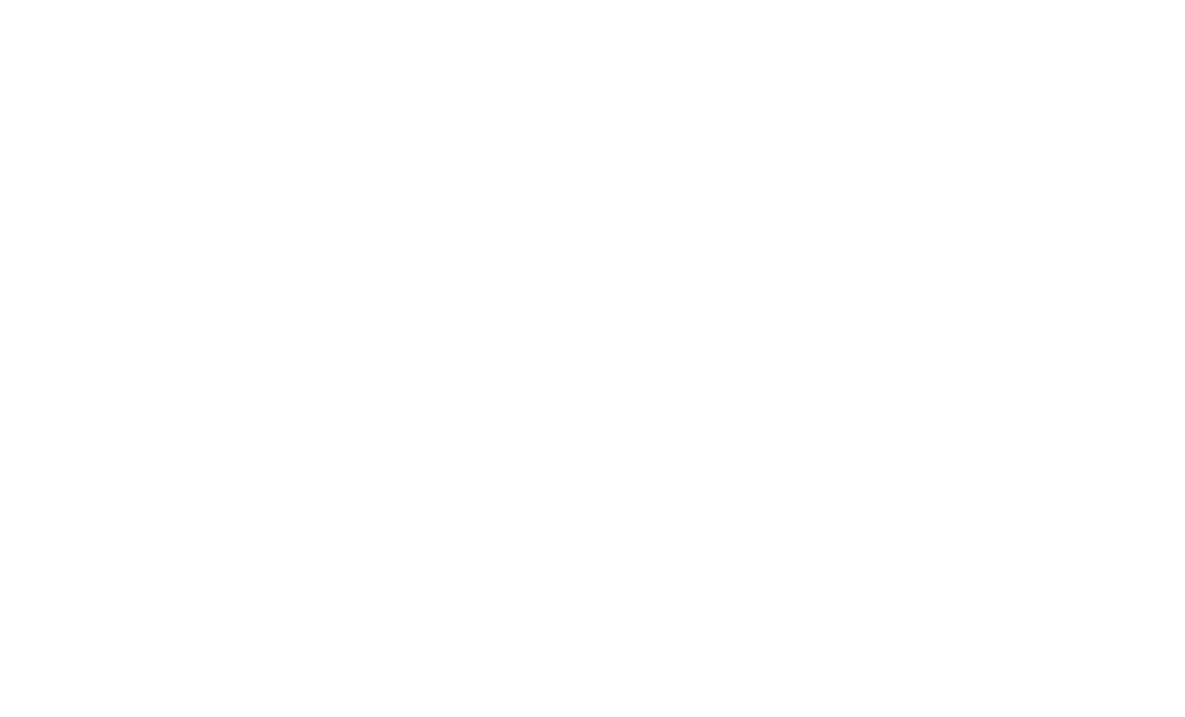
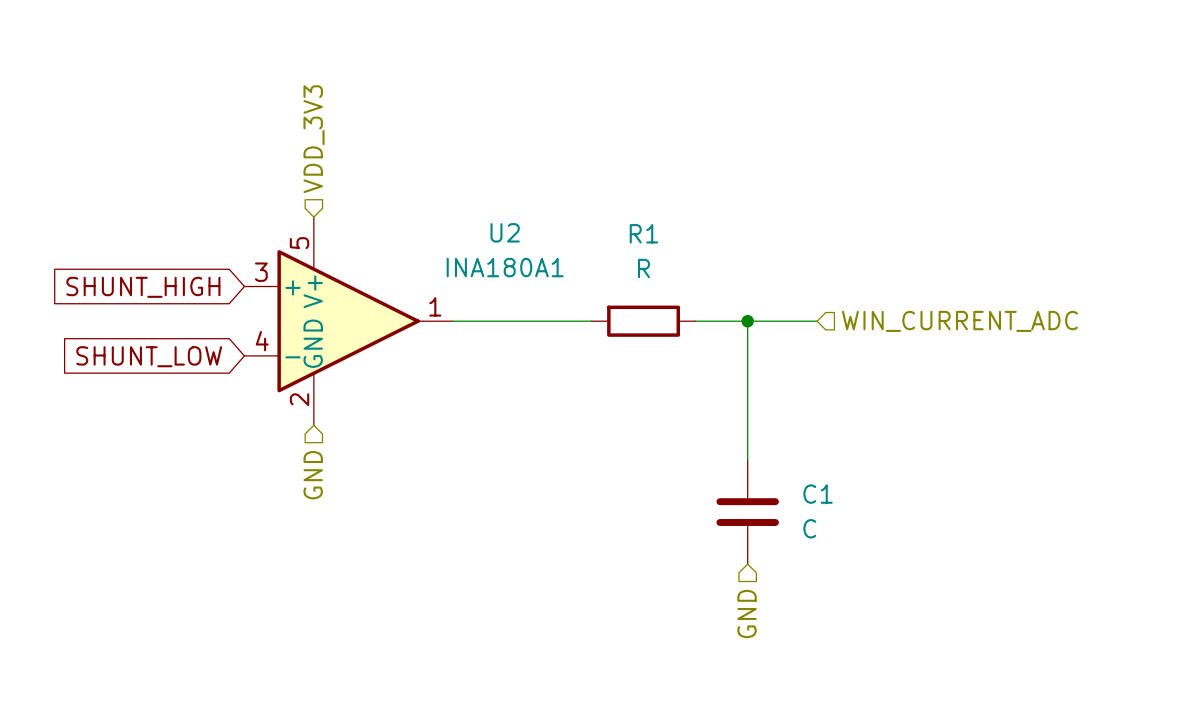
hierarchical label: none -> VDD_3V3 (314, 139)
global label: none -> SHUNT_HIGH (143, 287)
U2: none -> INA180A1 (348, 321)
wire: none -> (452, 321) (591, 321)
R1: none -> R (643, 321)
wire: none -> (695, 321) (817, 321)
wire: none -> (747, 321) (747, 460)
junction: none -> (747, 321)
hierarchical label: none -> WIN_CURRENT_ADC (959, 321)
global label: none -> SHUNT_LOW (149, 356)
hierarchical label: none -> GND (313, 475)
C1: none -> C (747, 512)
hierarchical label: none -> GND (747, 614)

